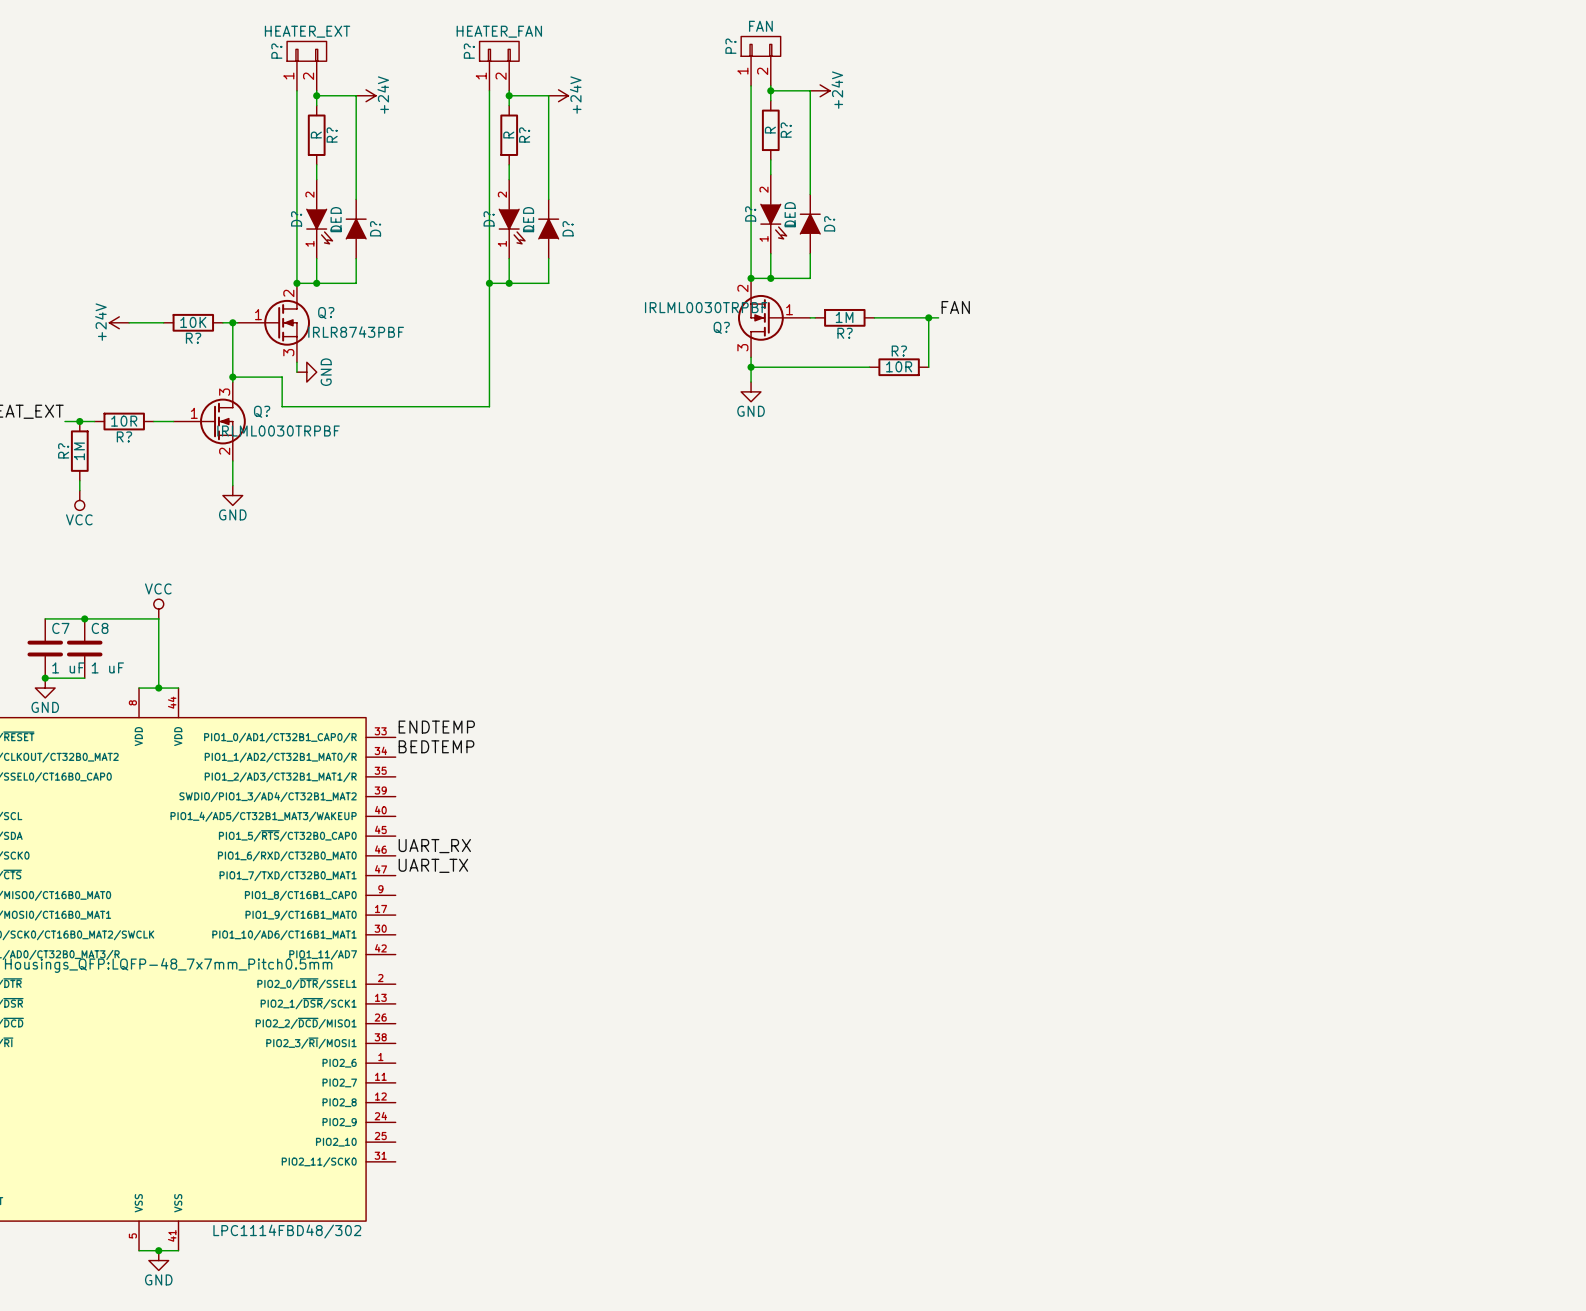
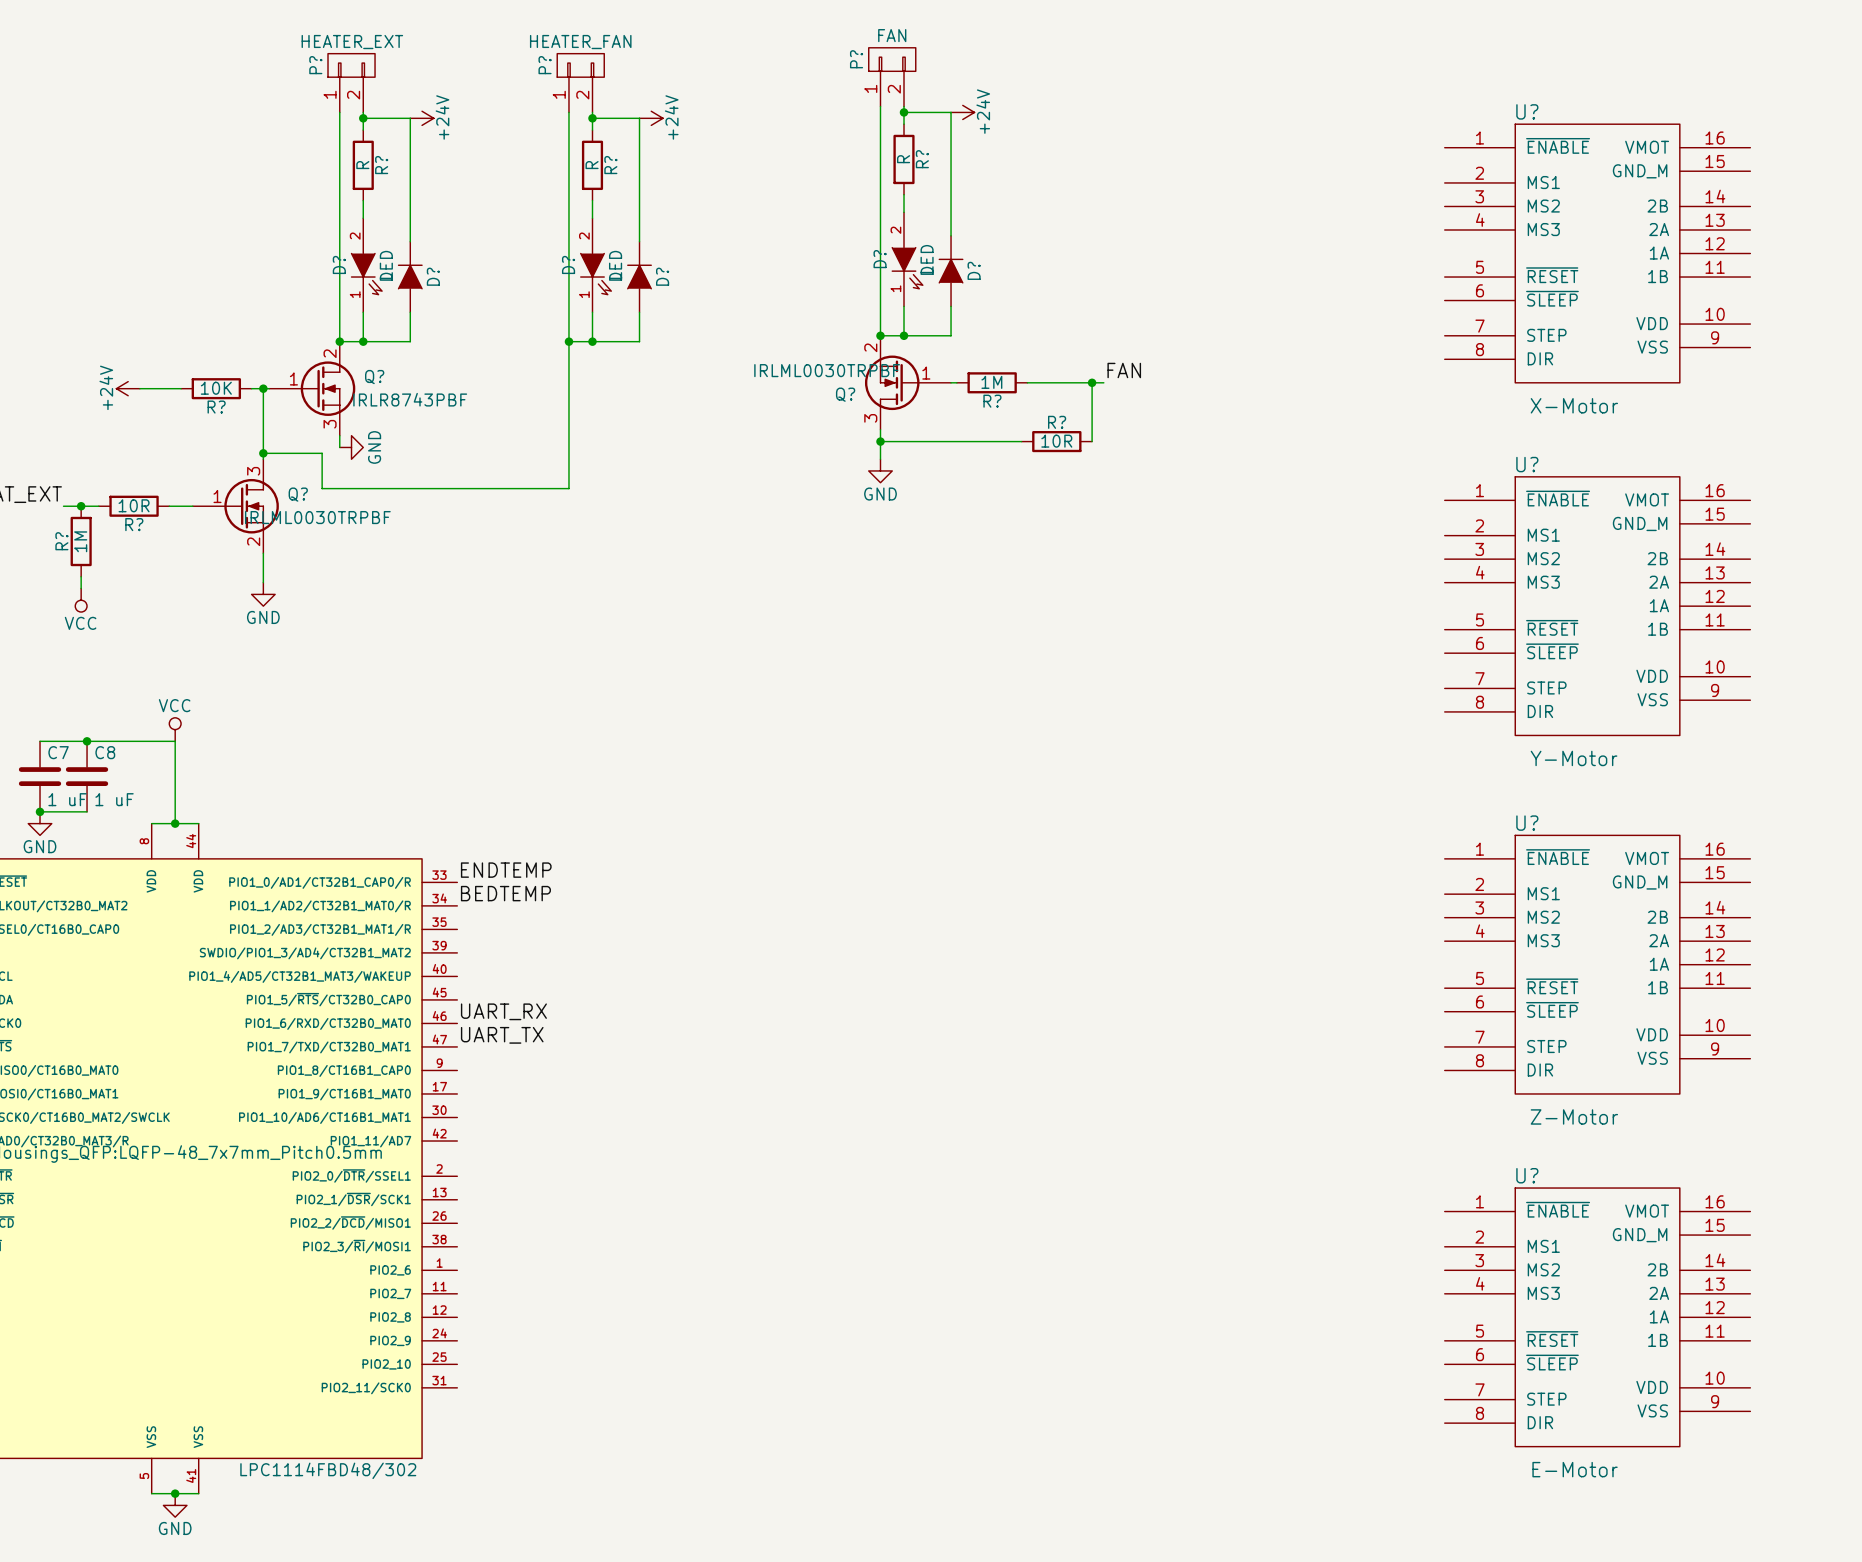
U?: none -> X-Motor (1597, 253)
U?: none -> Y-Motor (1597, 606)
U?: none -> Z-Motor (1597, 964)
U?: none -> E-Motor (1597, 1317)

